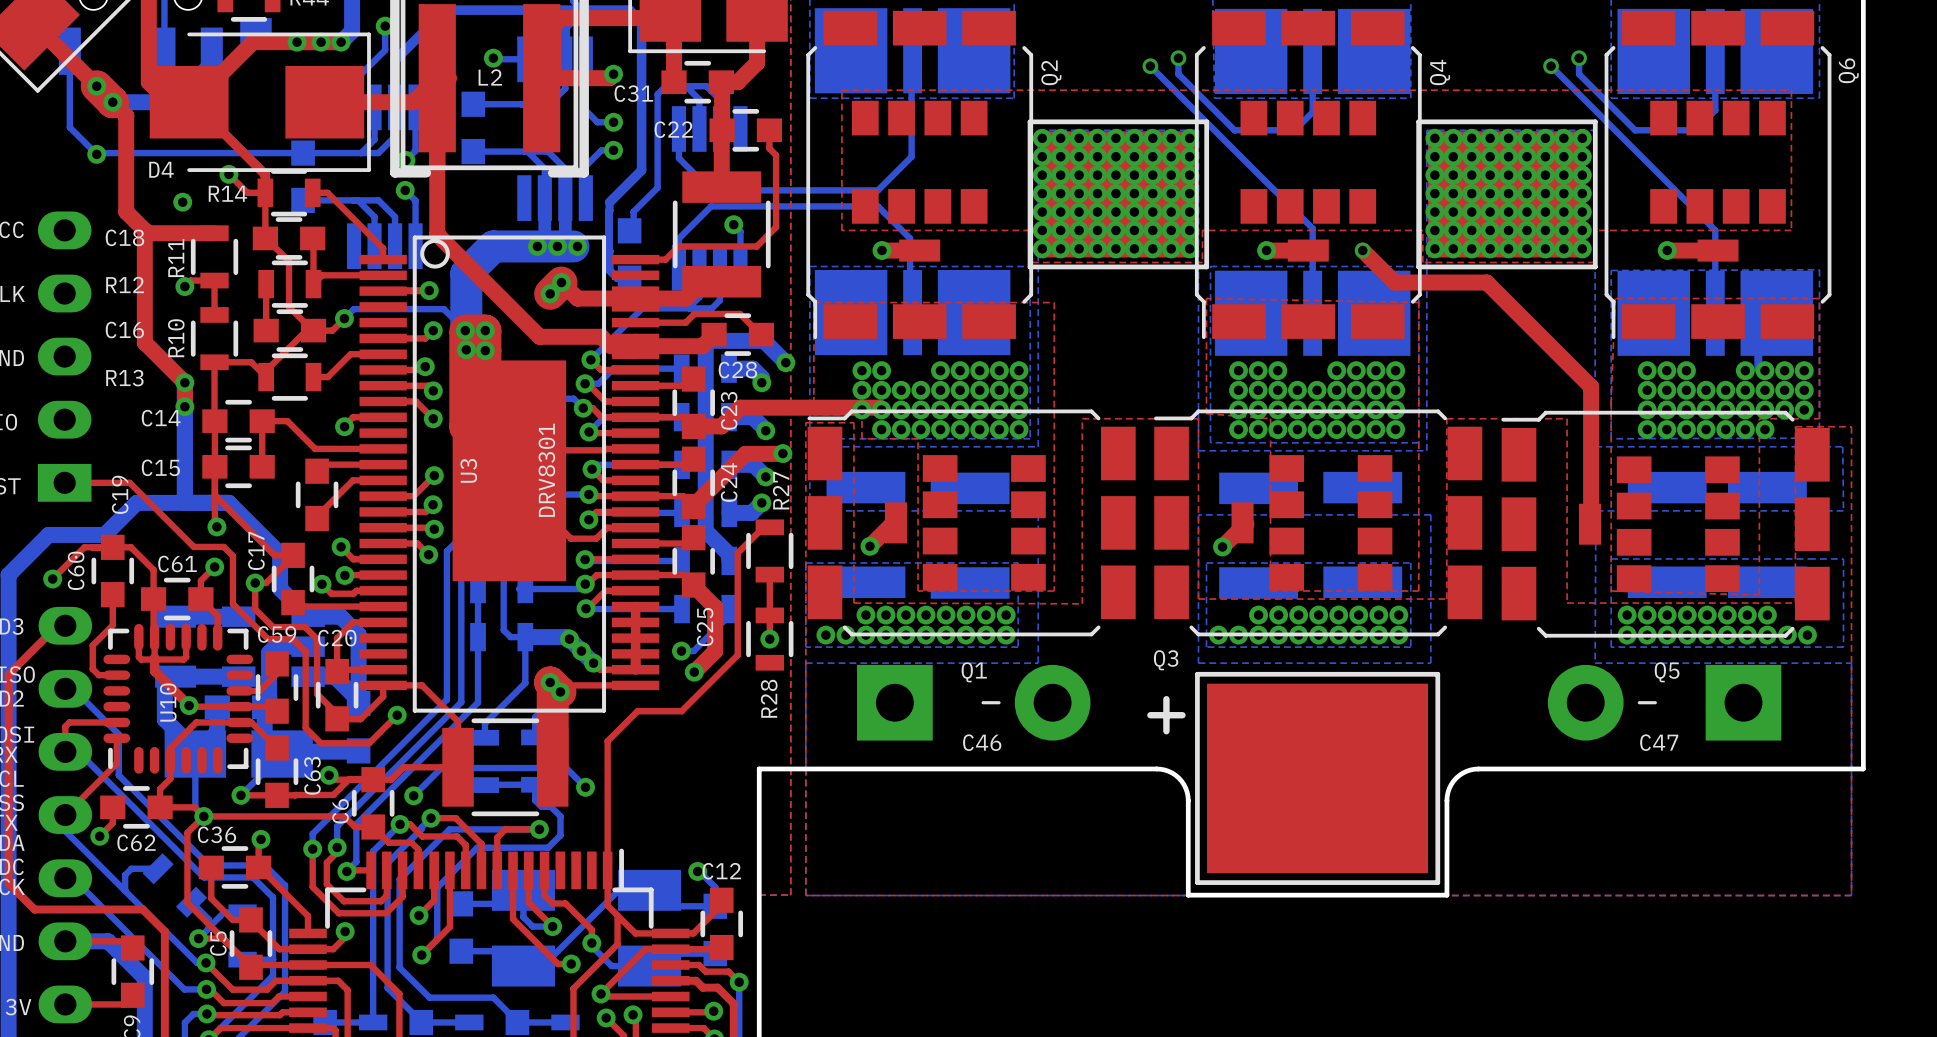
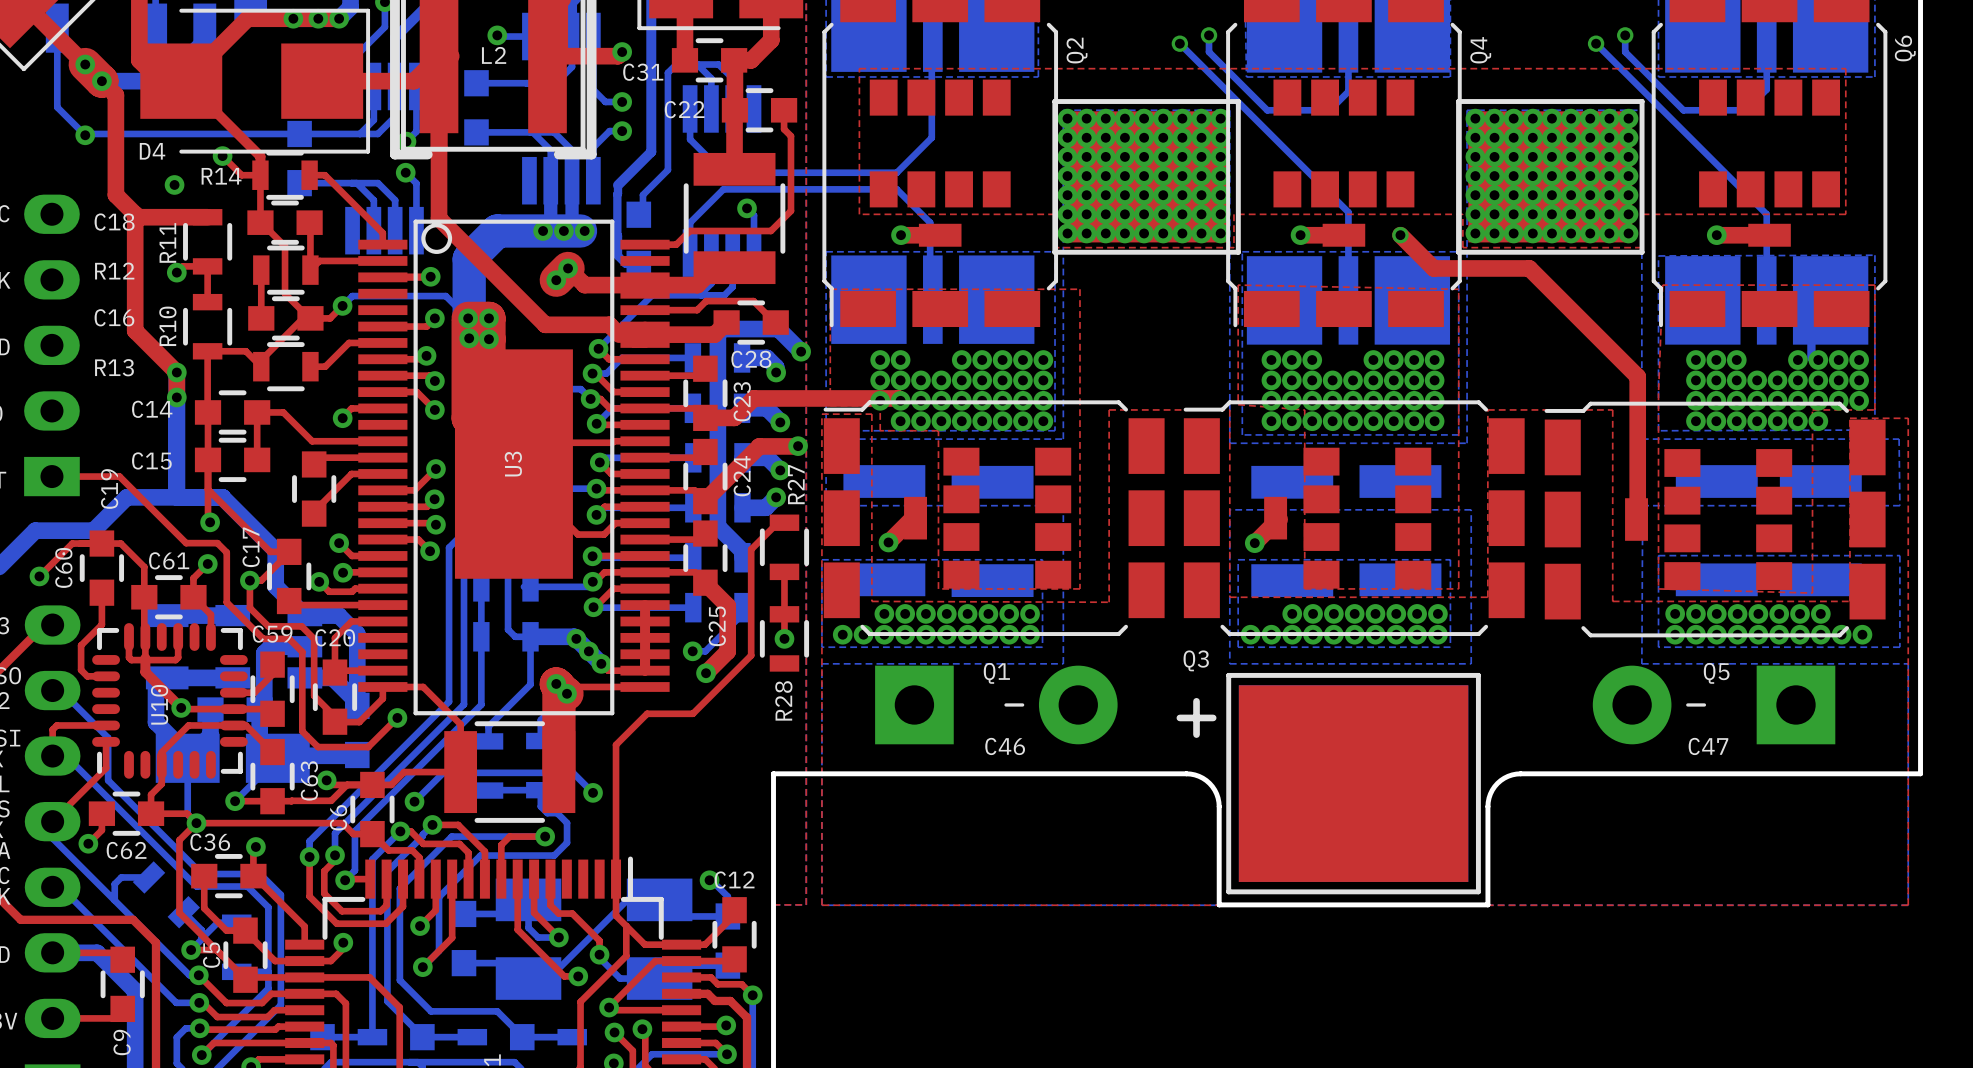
U3 name position: U3 (468, 470) -> U3 (513, 464)
U3 value: DRV8301 (546, 470) -> none

